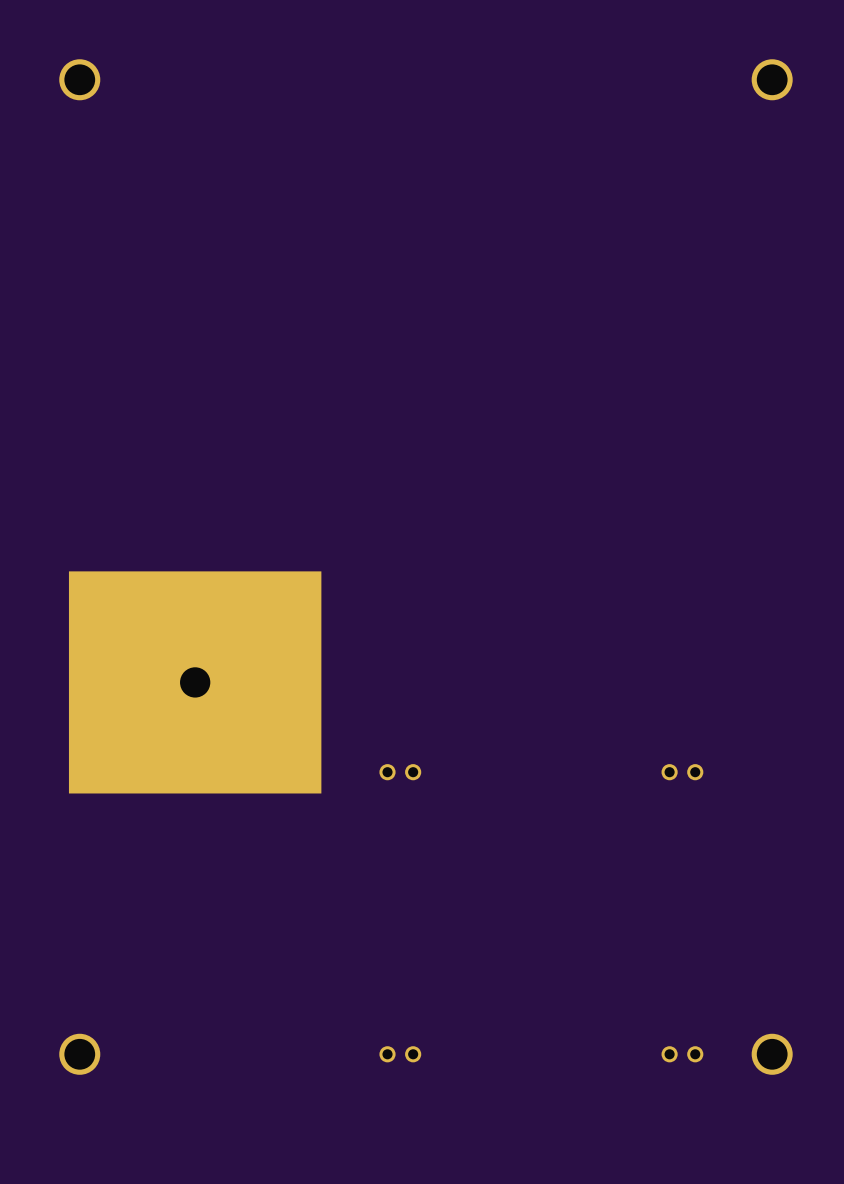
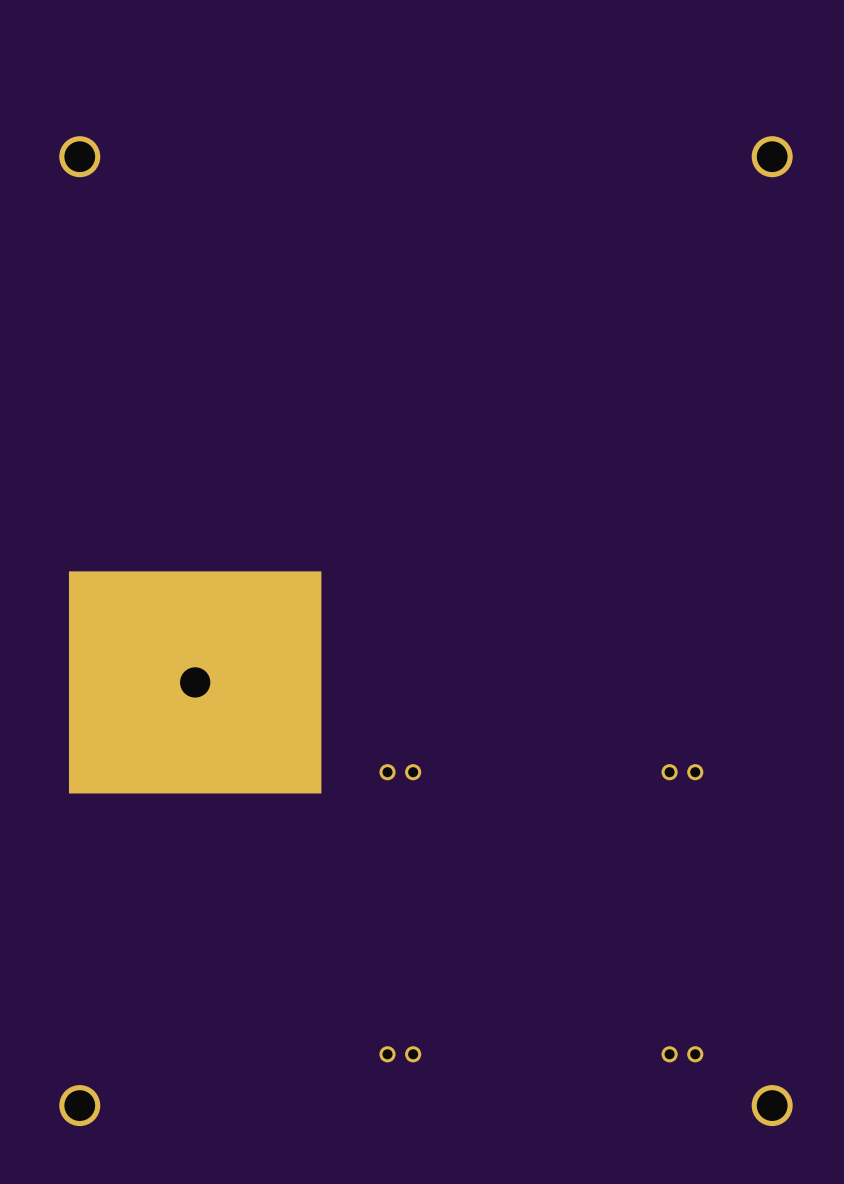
part position: (79, 79) -> (79, 156)
part position: (772, 79) -> (772, 156)
part position: (79, 1054) -> (79, 1105)
part position: (772, 1054) -> (772, 1105)

